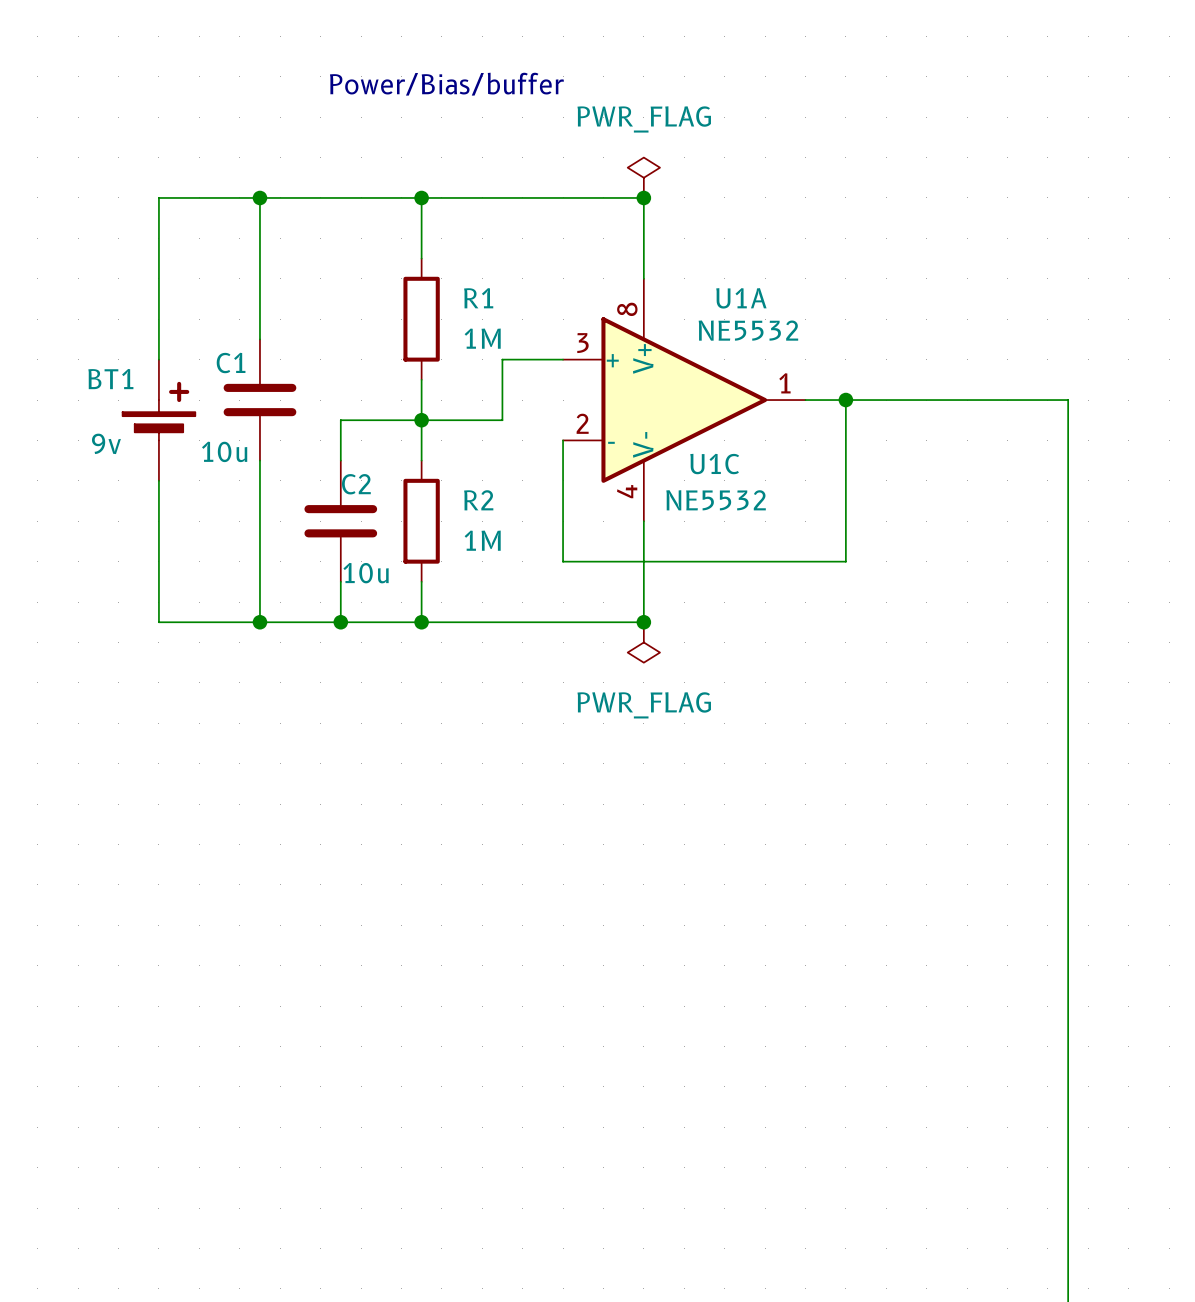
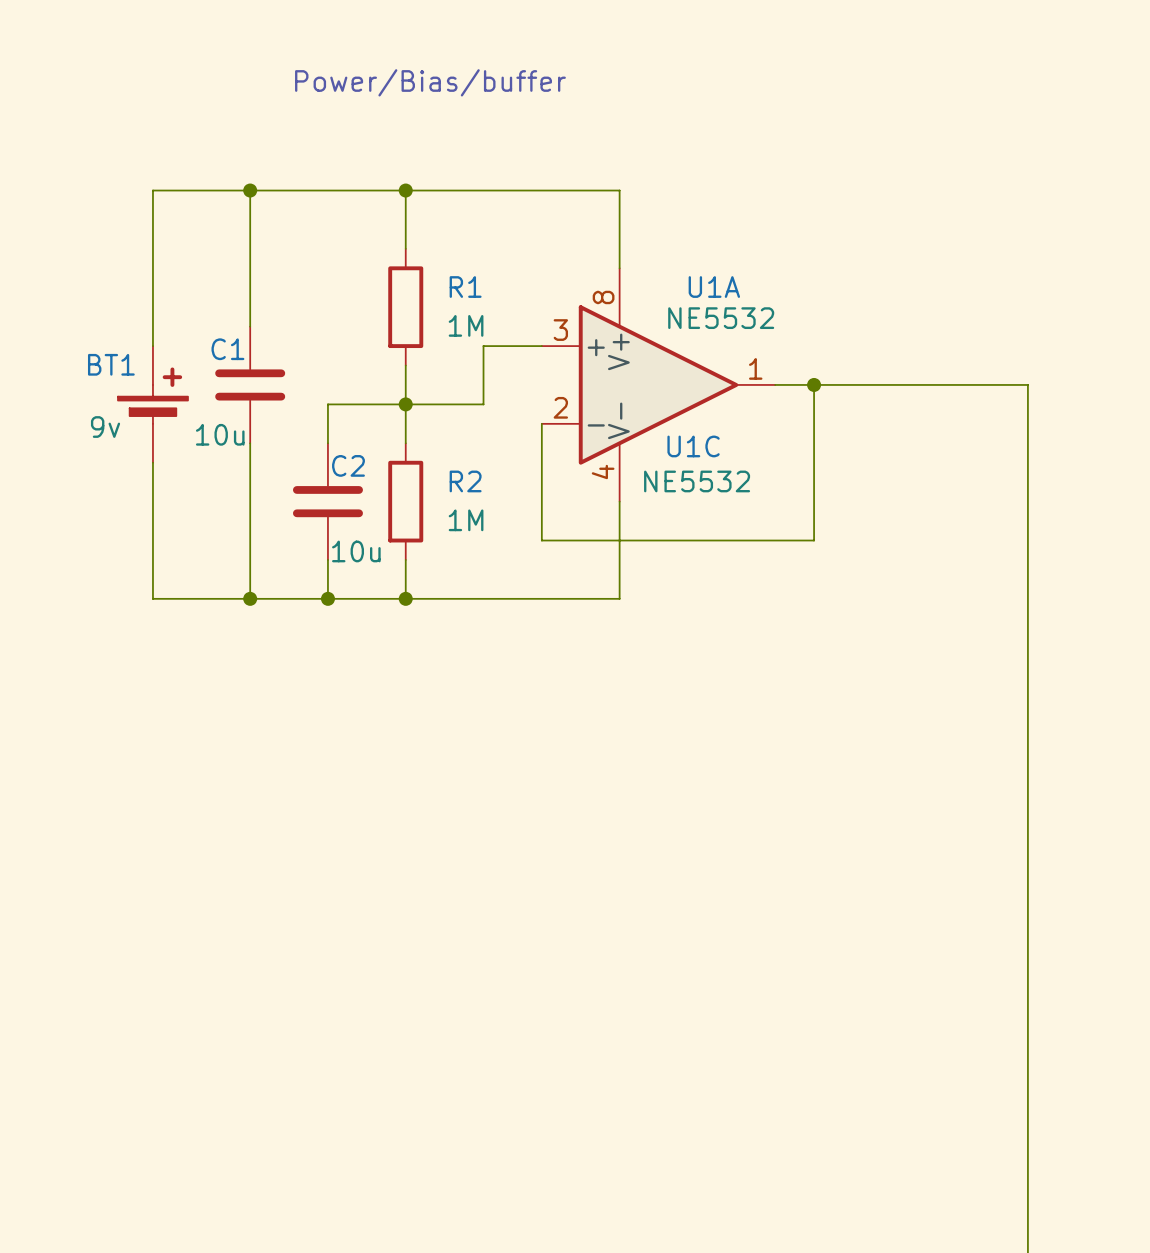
power symbol: PWR_FLAG (643, 177) -> none
junction: (643, 197) -> none
junction: (643, 622) -> none
power symbol: PWR_FLAG (643, 642) -> none

